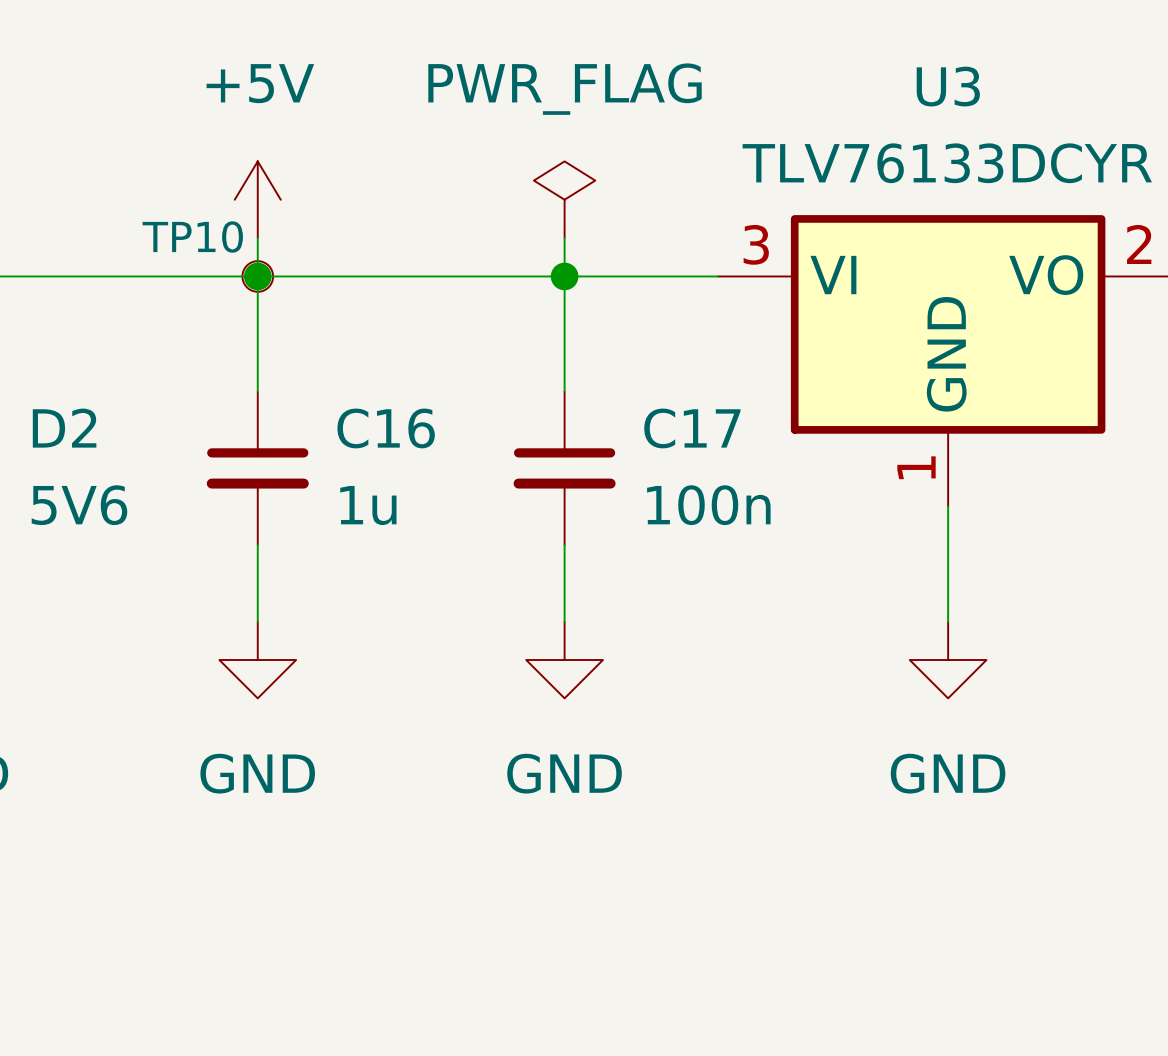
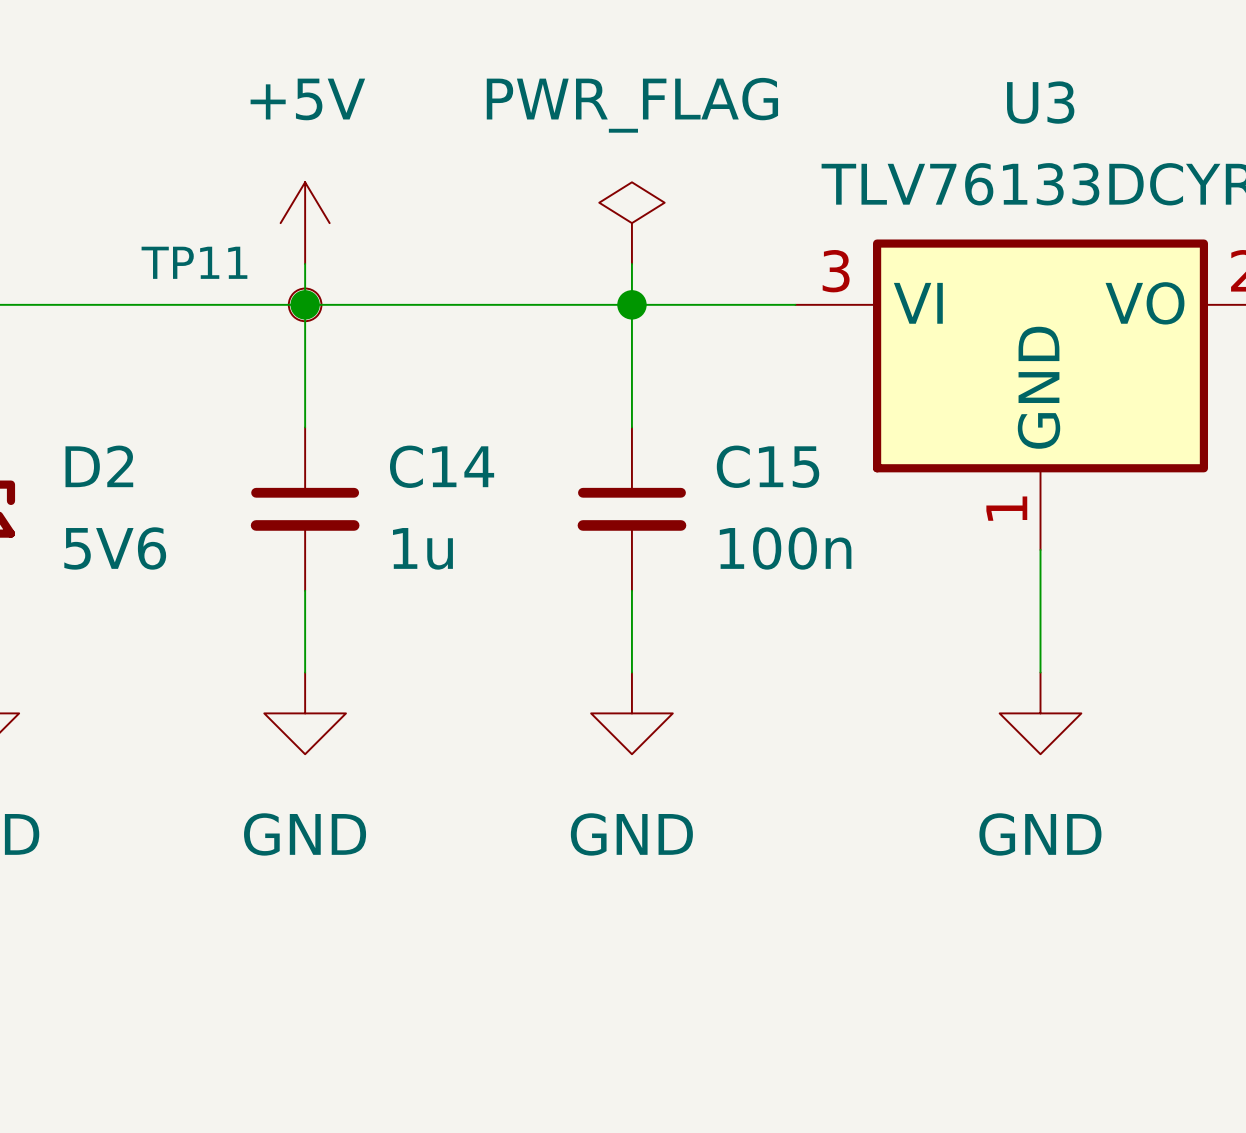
TP10 name: TP10 (192, 237) -> TP11 (194, 262)
C16 name: C16 (386, 428) -> C14 (442, 466)
C17 name: C17 (692, 428) -> C15 (768, 466)

